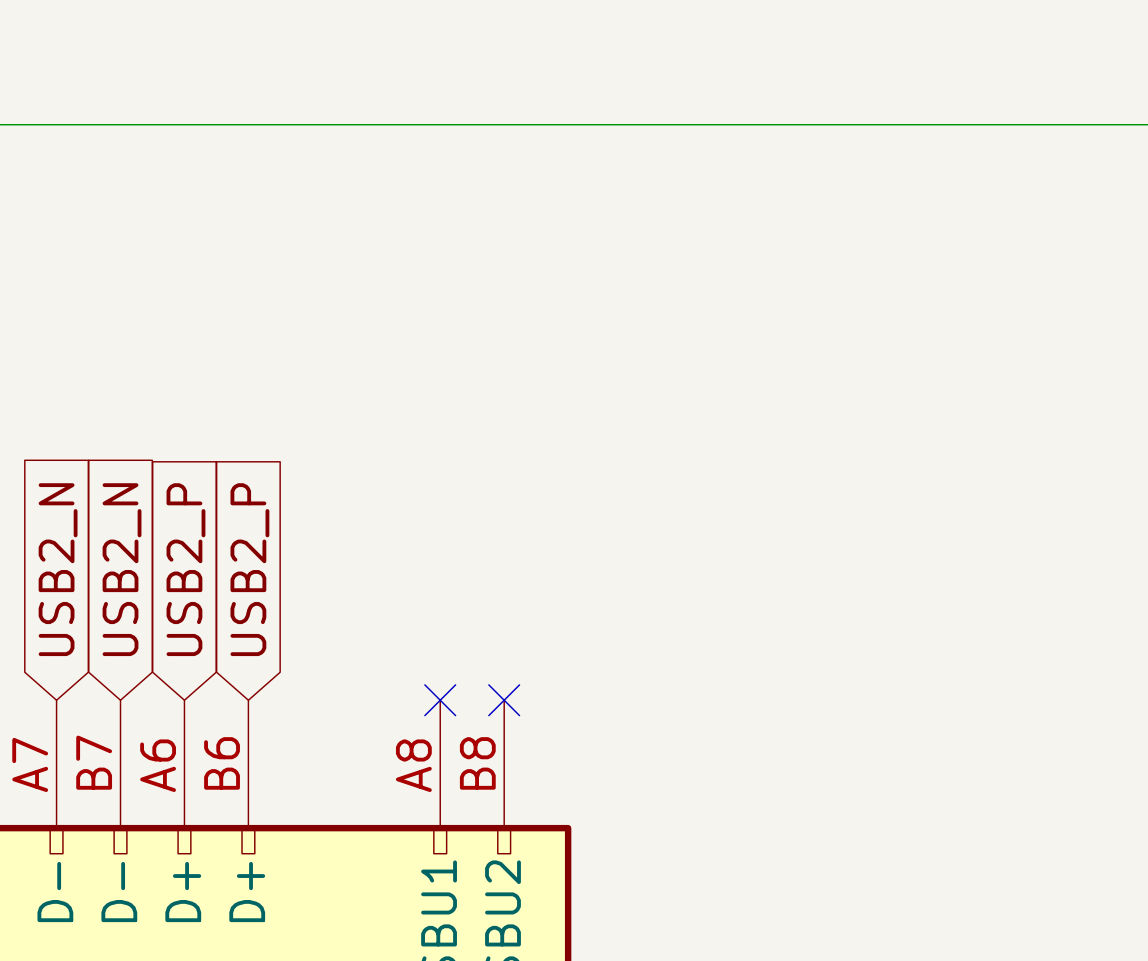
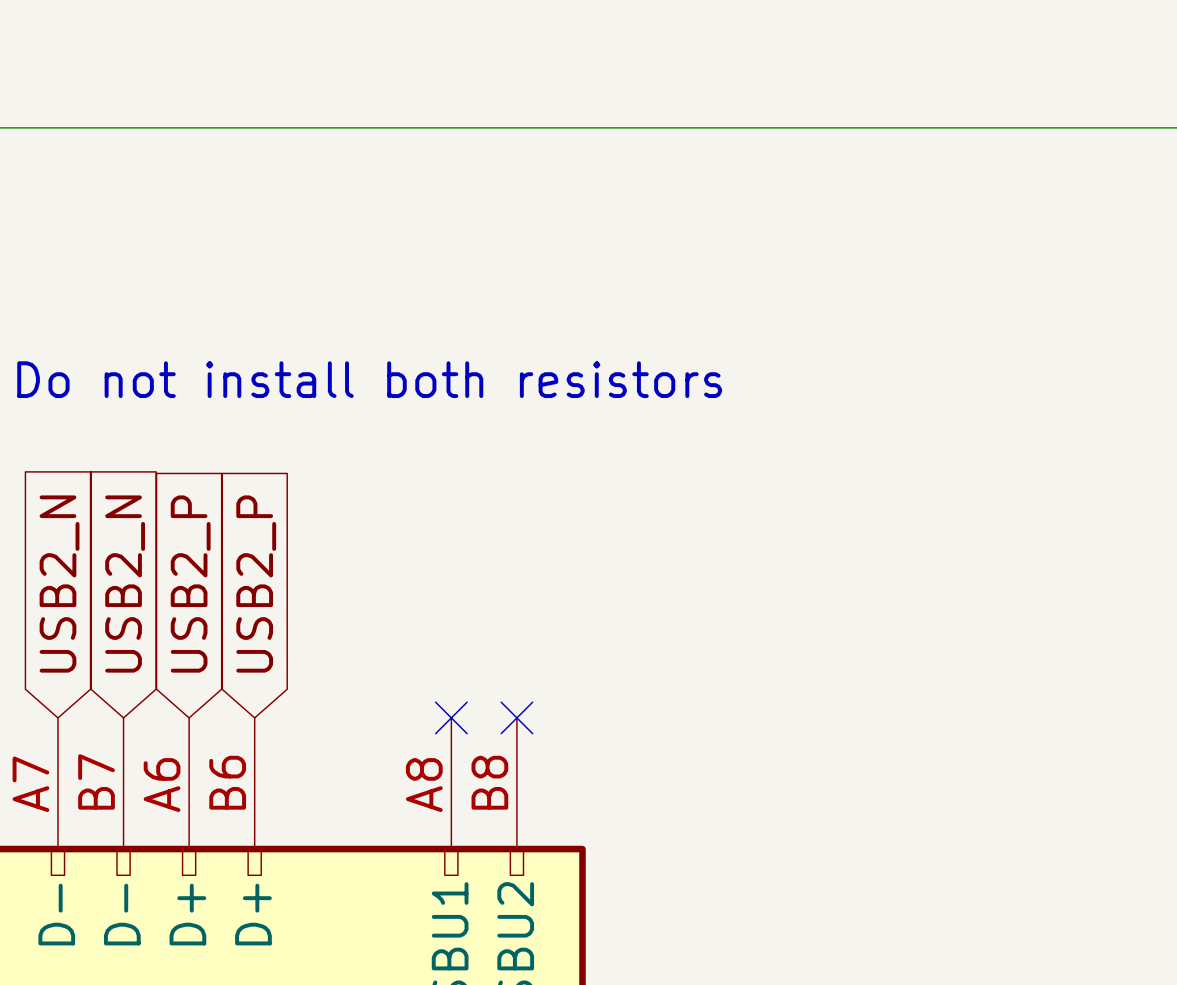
text: none -> Do not install both resistors (369, 379)

